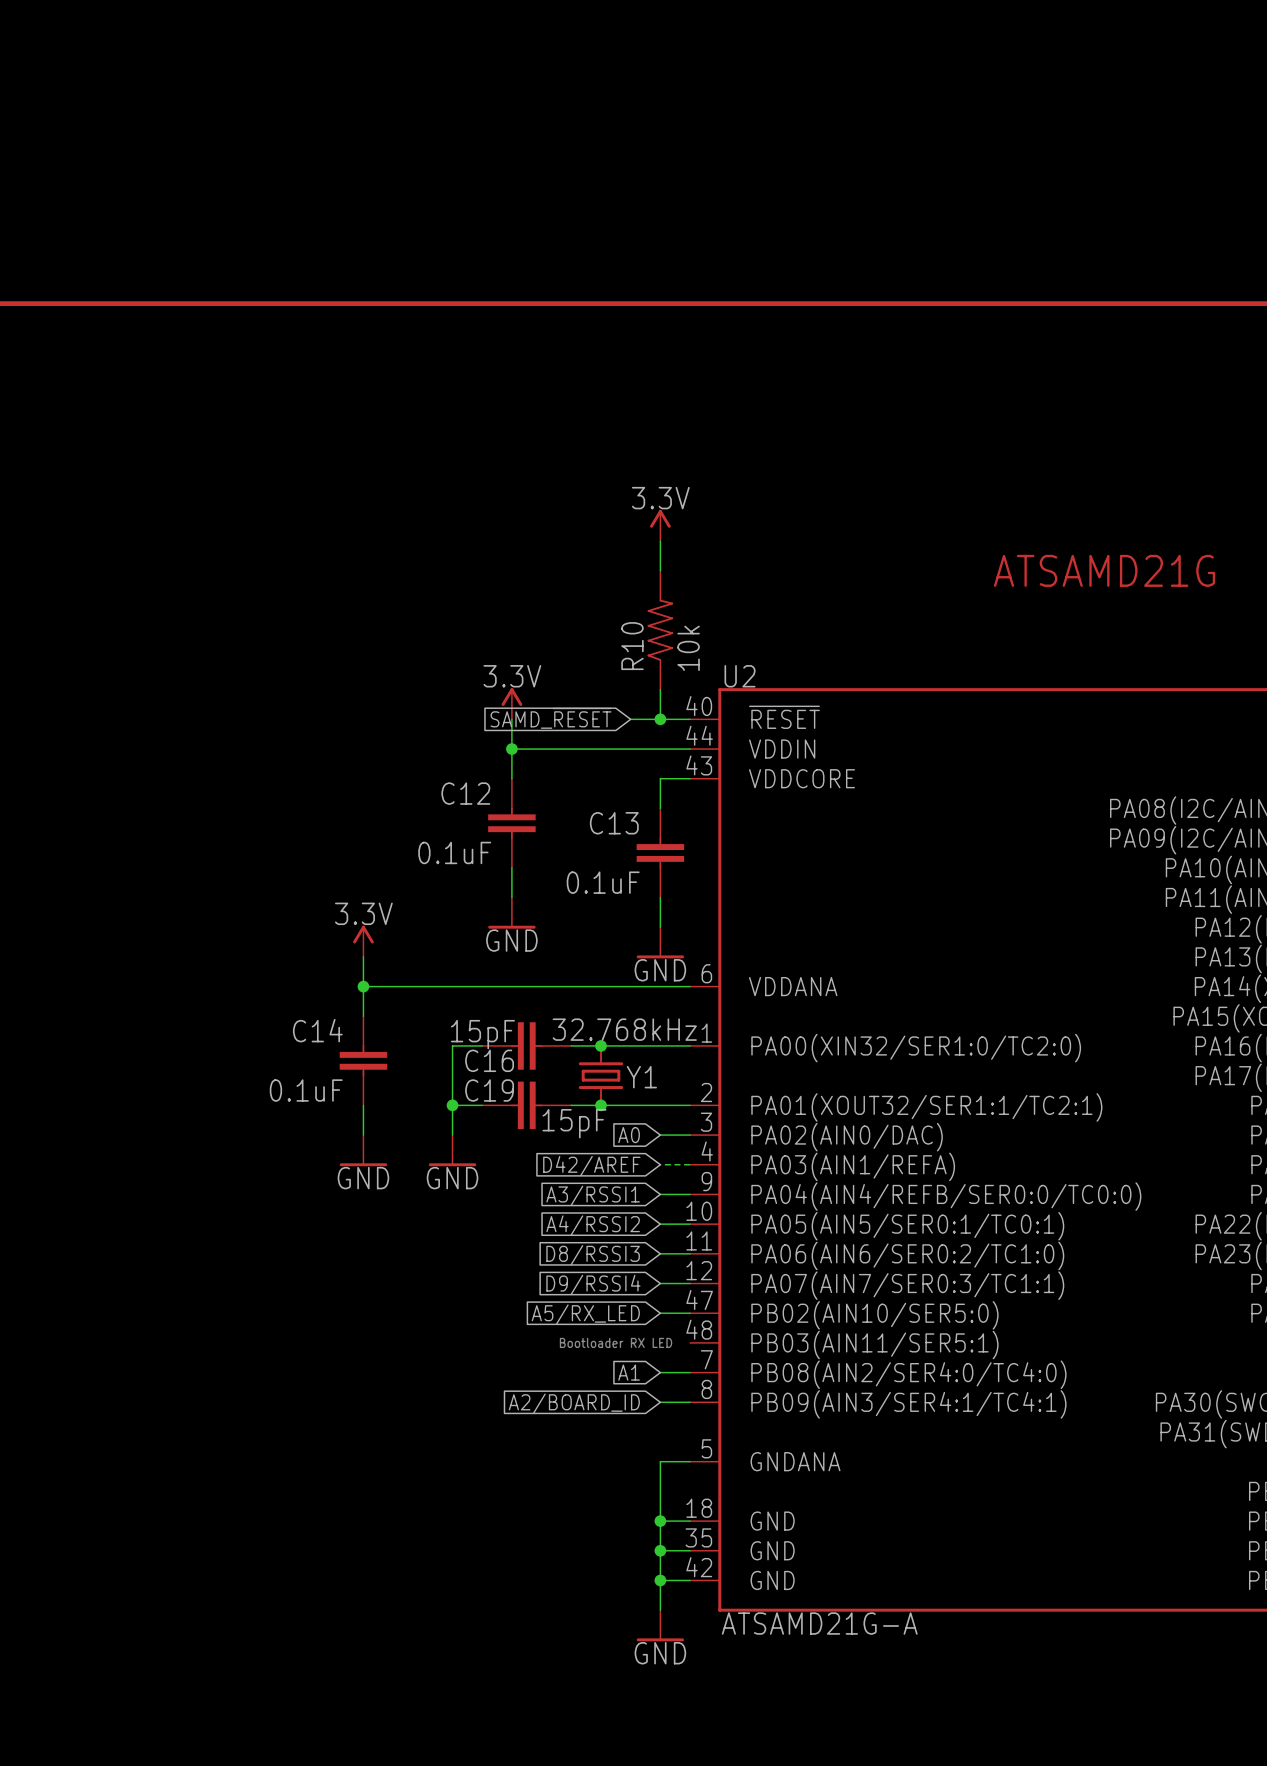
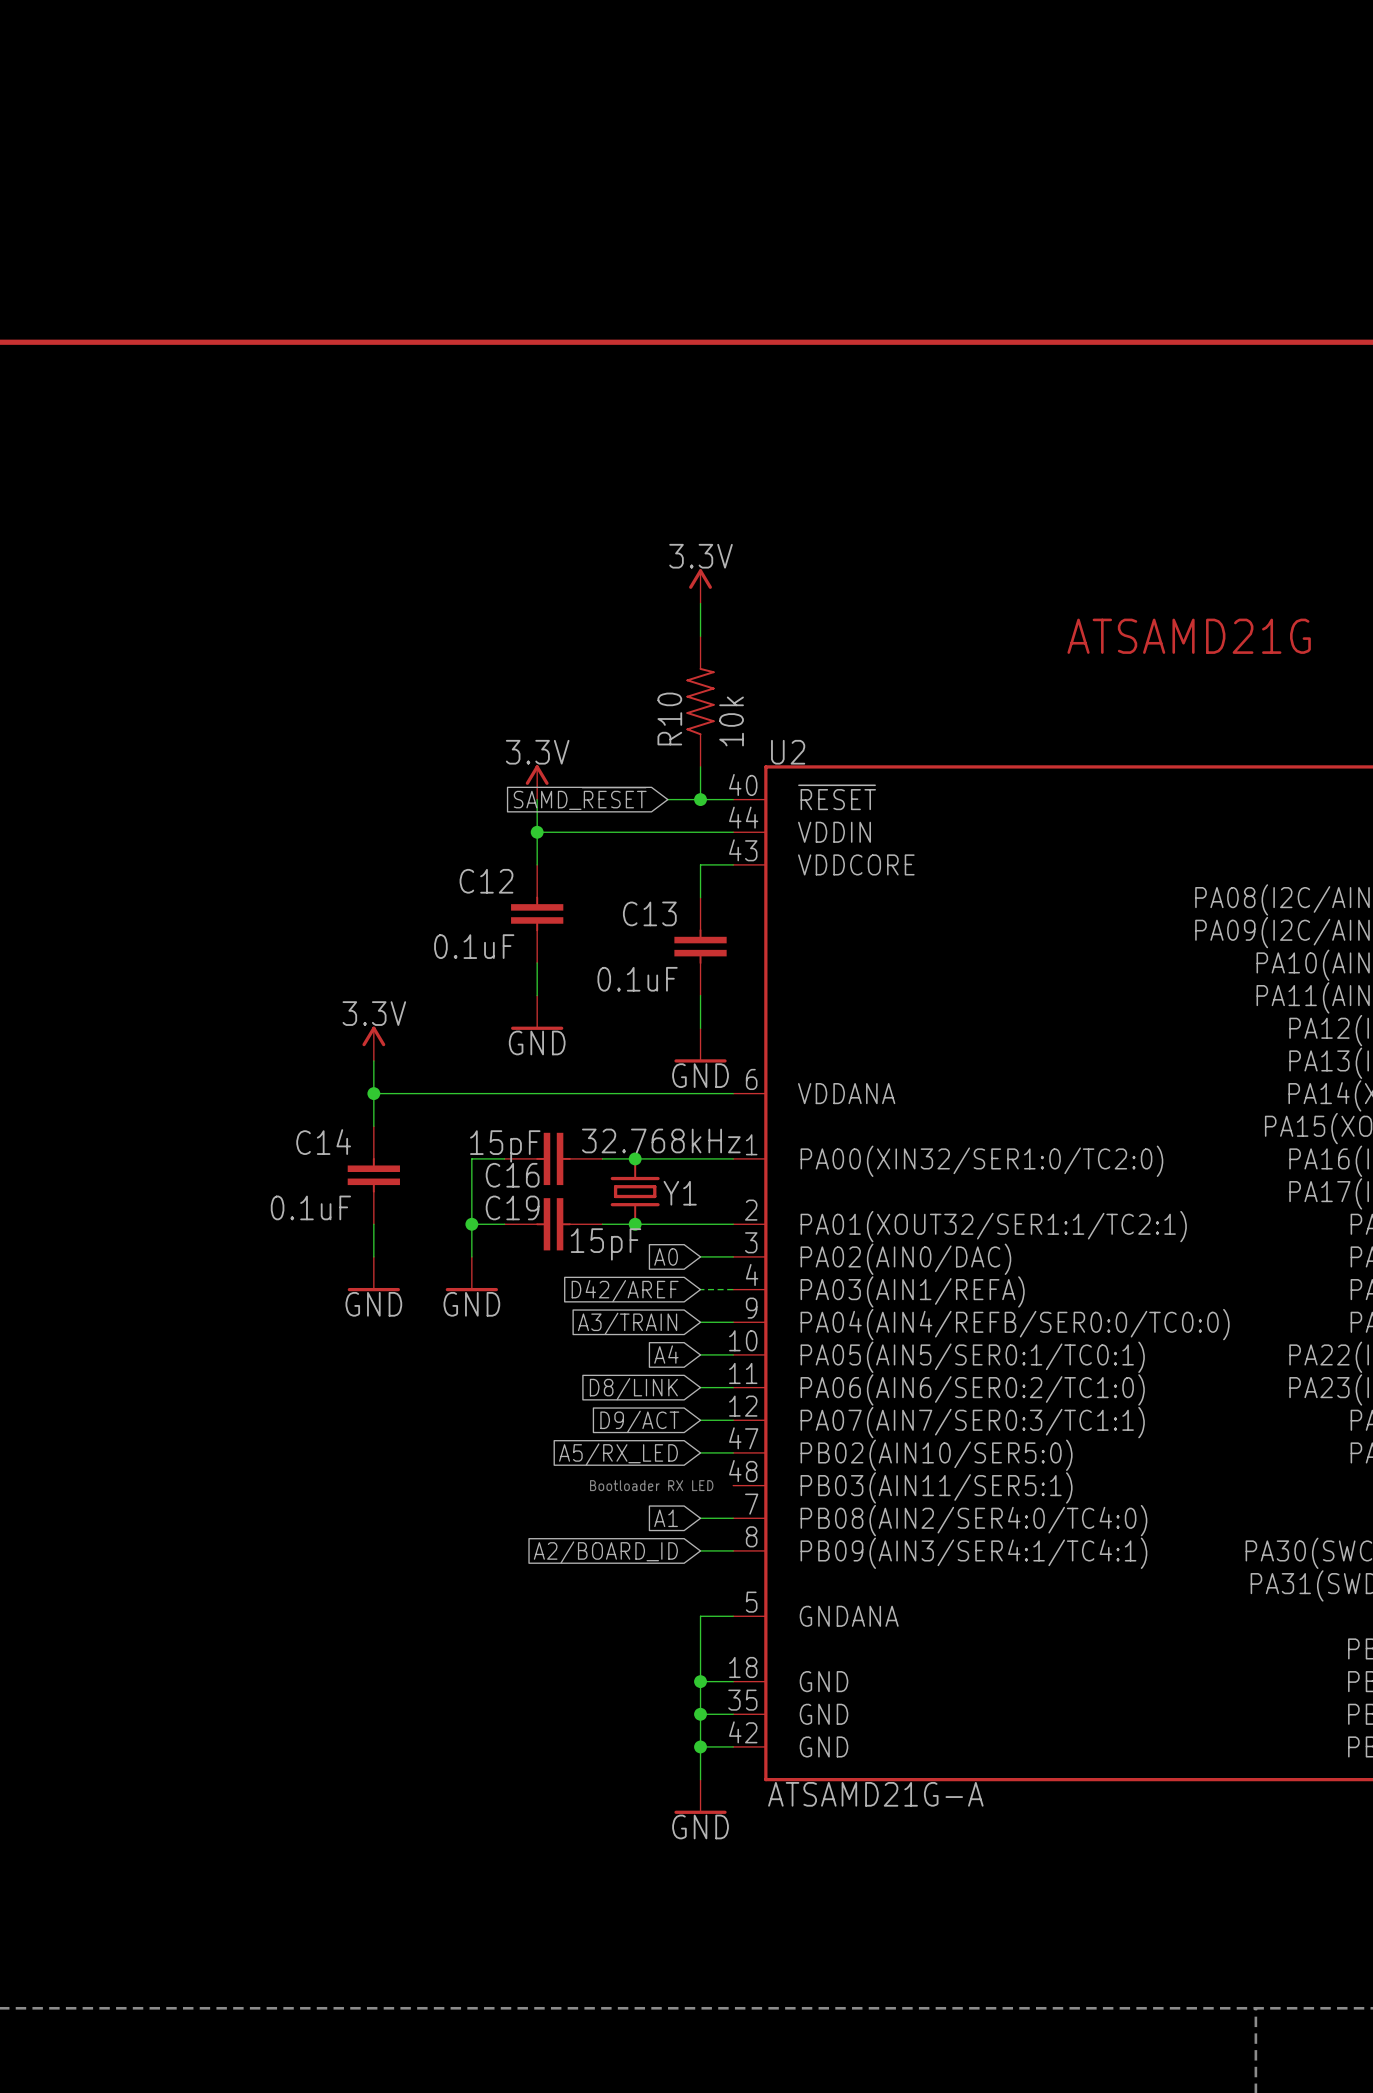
global label: A3/RSSI1 (593, 1195) -> A3/TRAIN (627, 1323)
global label: A4/RSSI2 (593, 1225) -> A4 (666, 1354)
global label: D8/RSSI3 (593, 1255) -> D8/LINK (633, 1389)
global label: D9/RSSI4 (593, 1284) -> D9/ACT (639, 1421)

